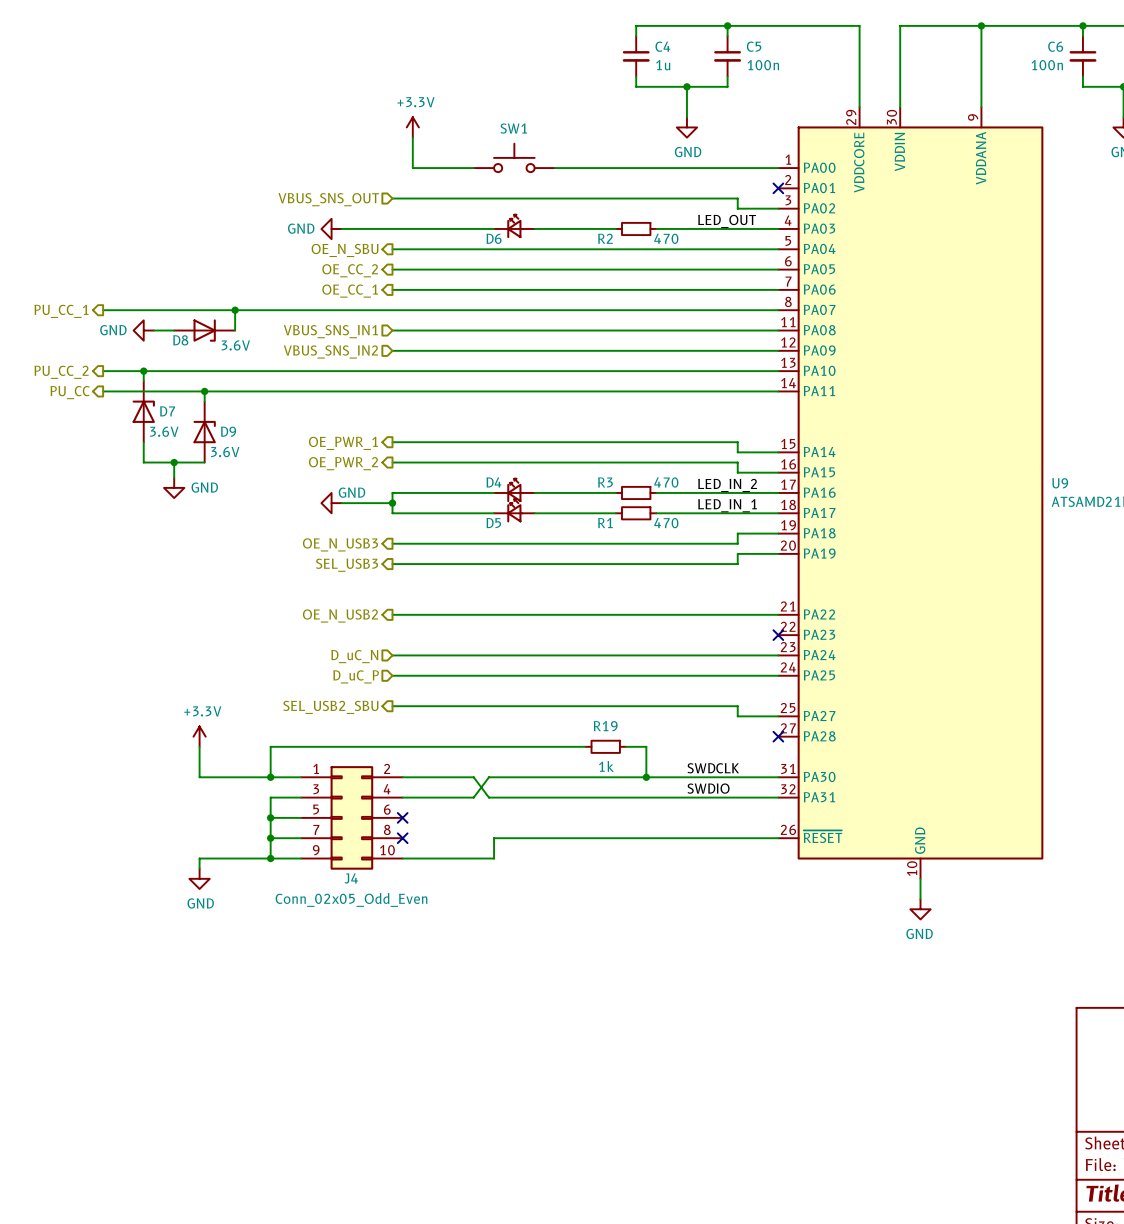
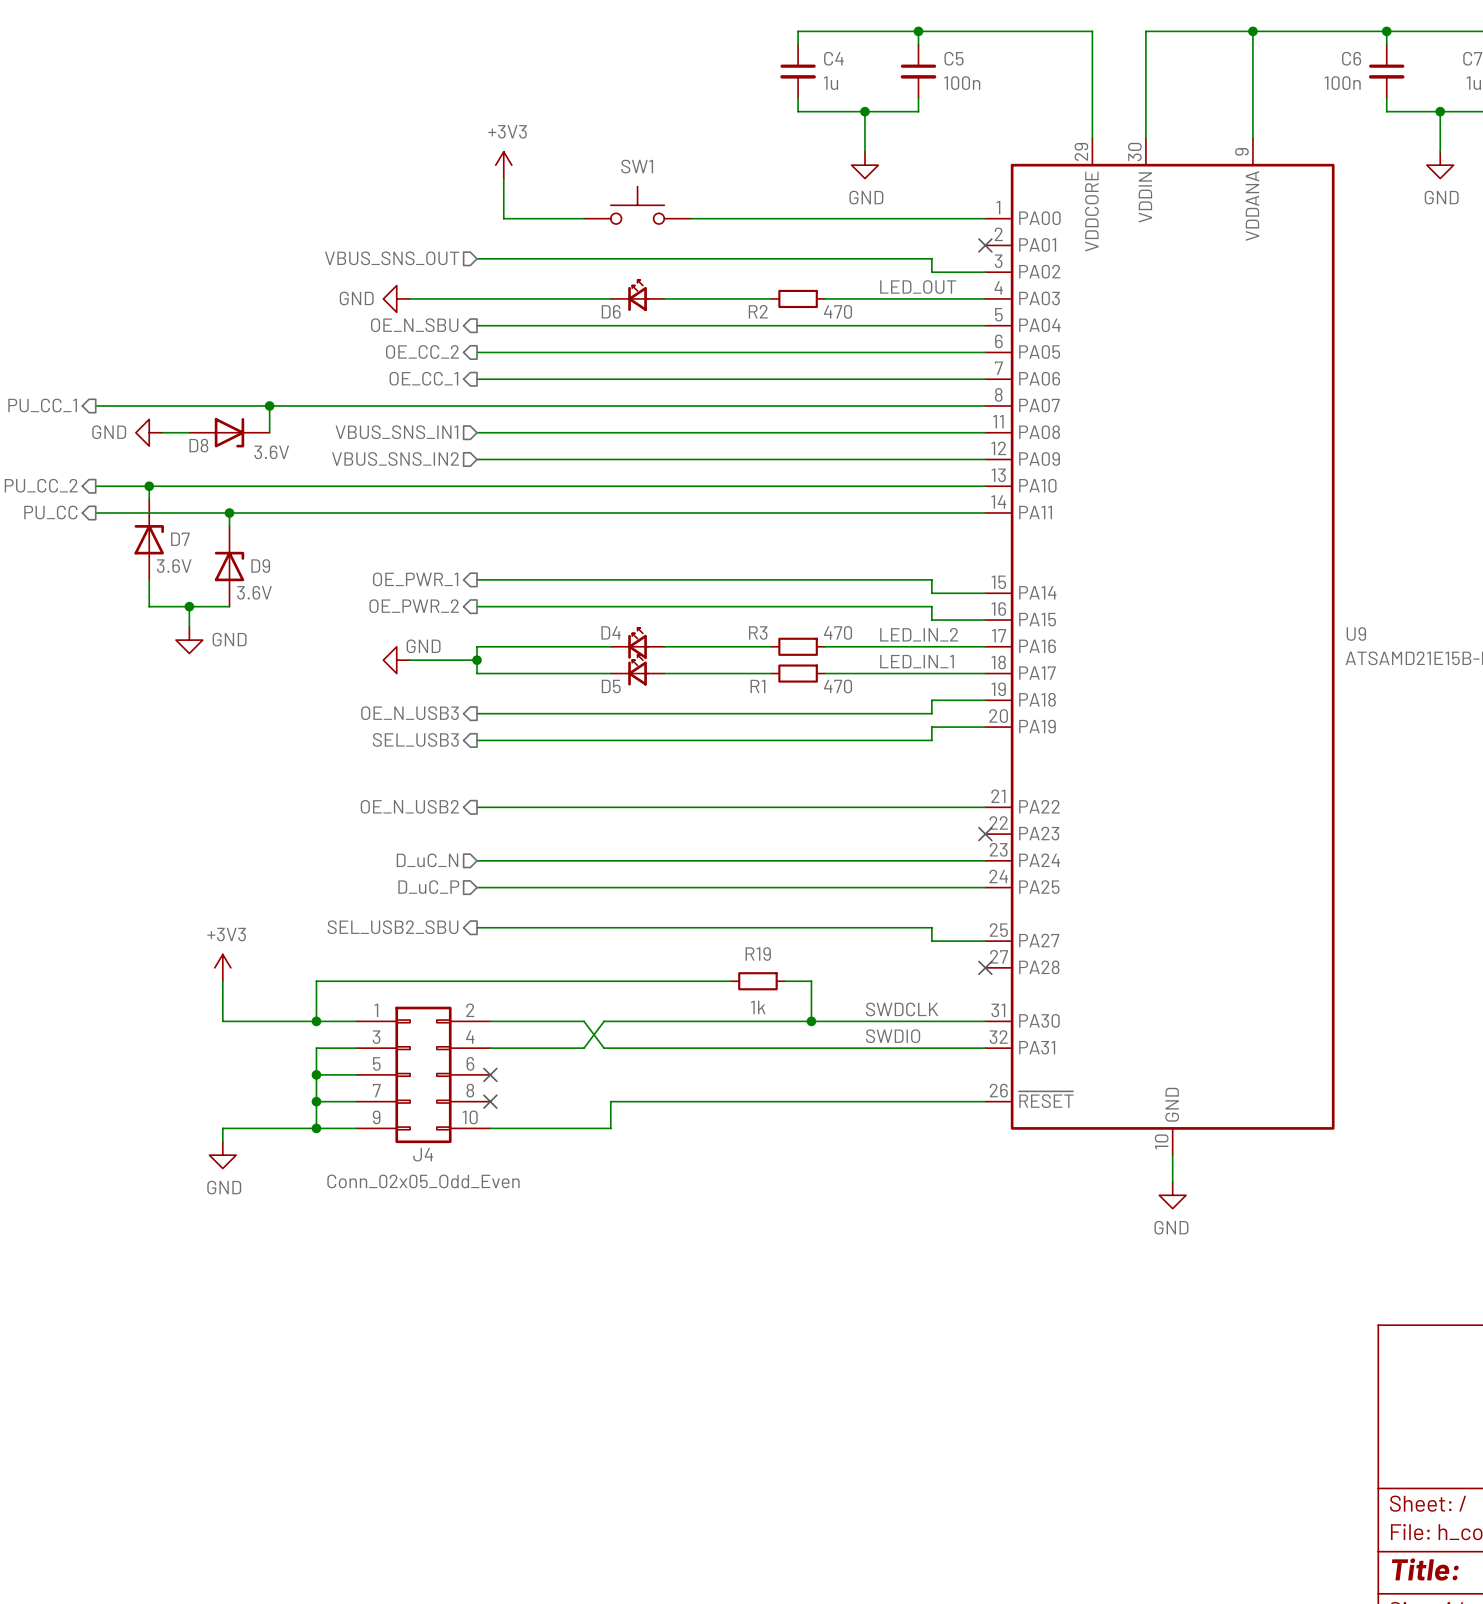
power symbol: +3.3V (412, 127) -> +3V3 (503, 165)
power symbol: +3.3V (199, 736) -> +3V3 (222, 967)

